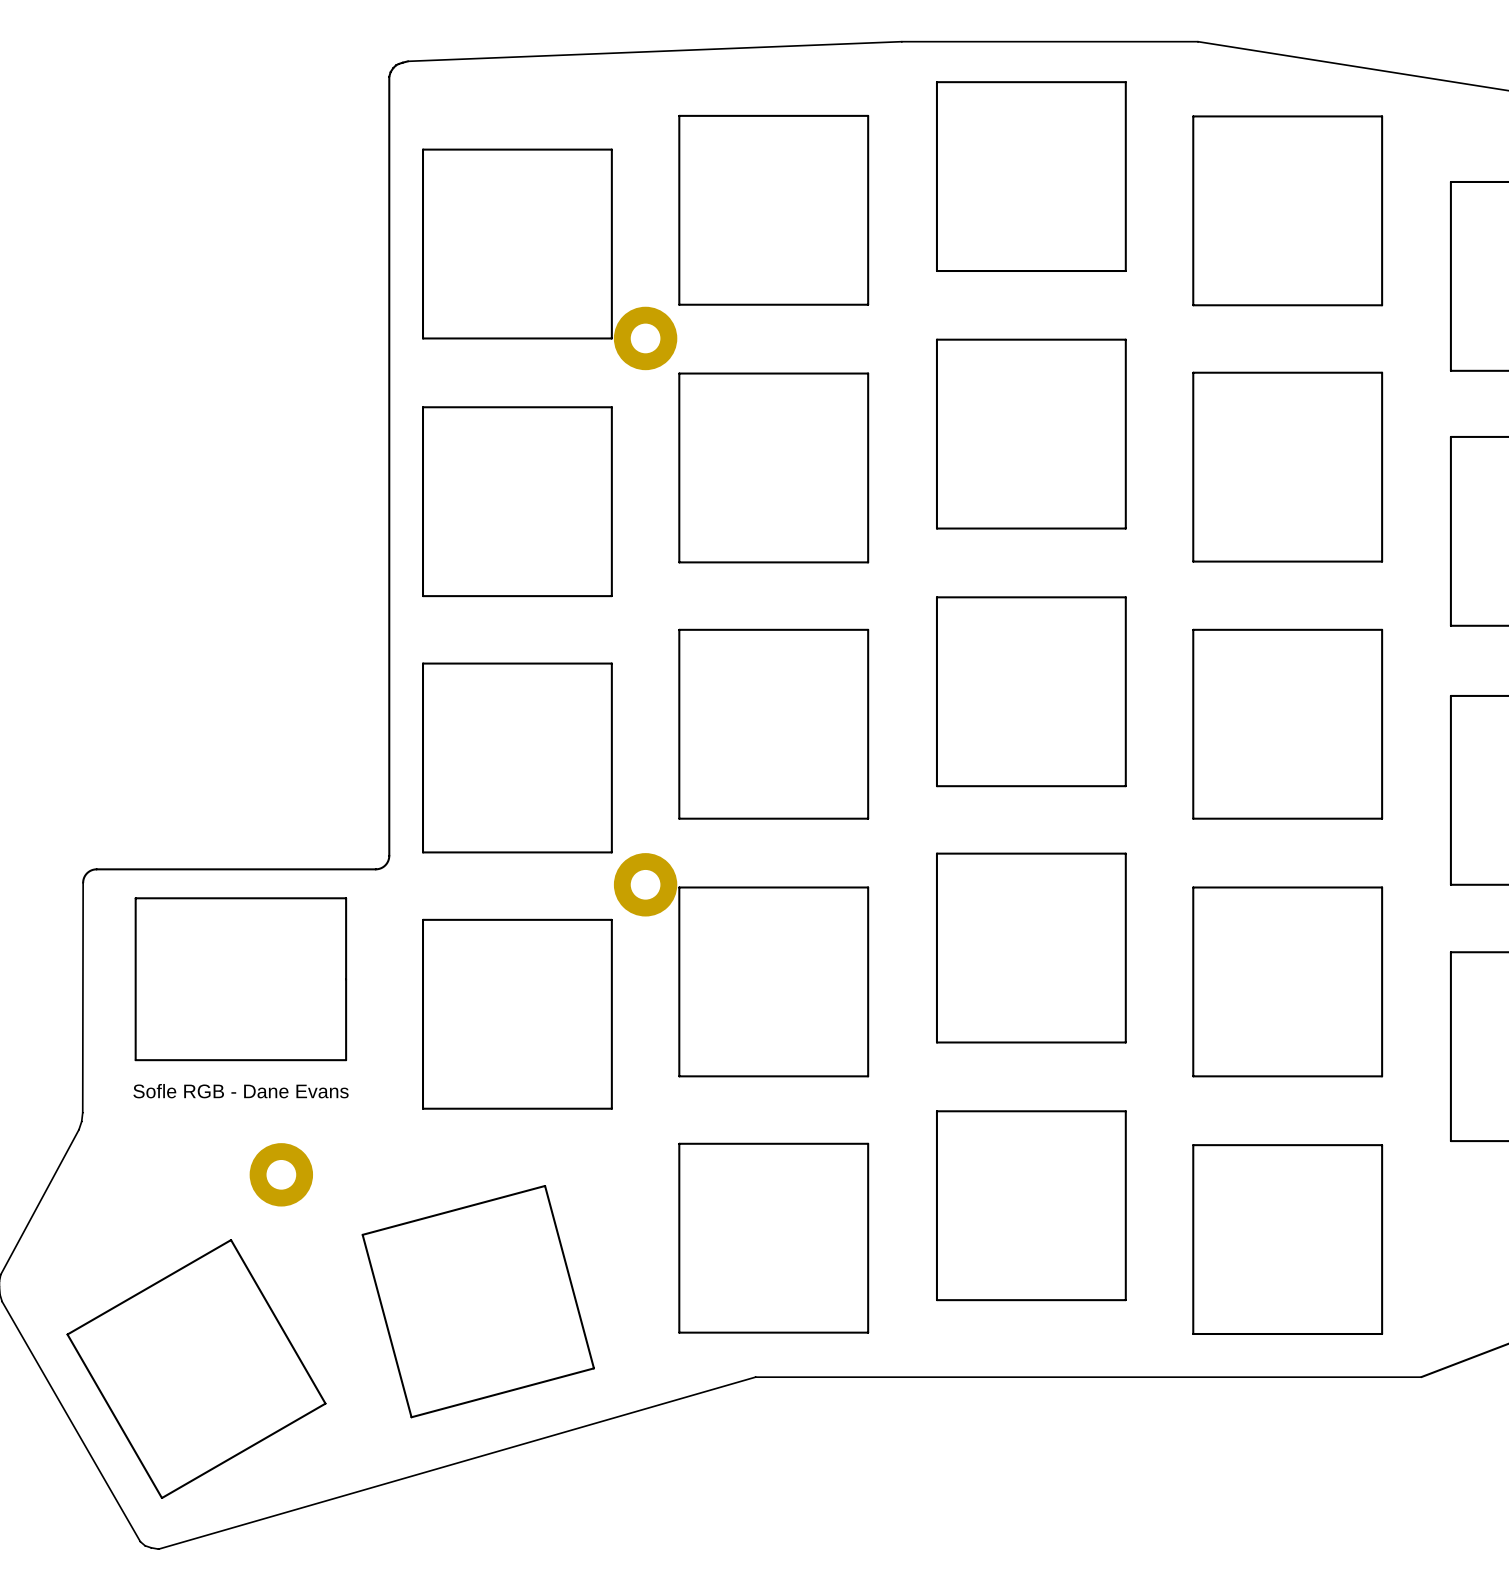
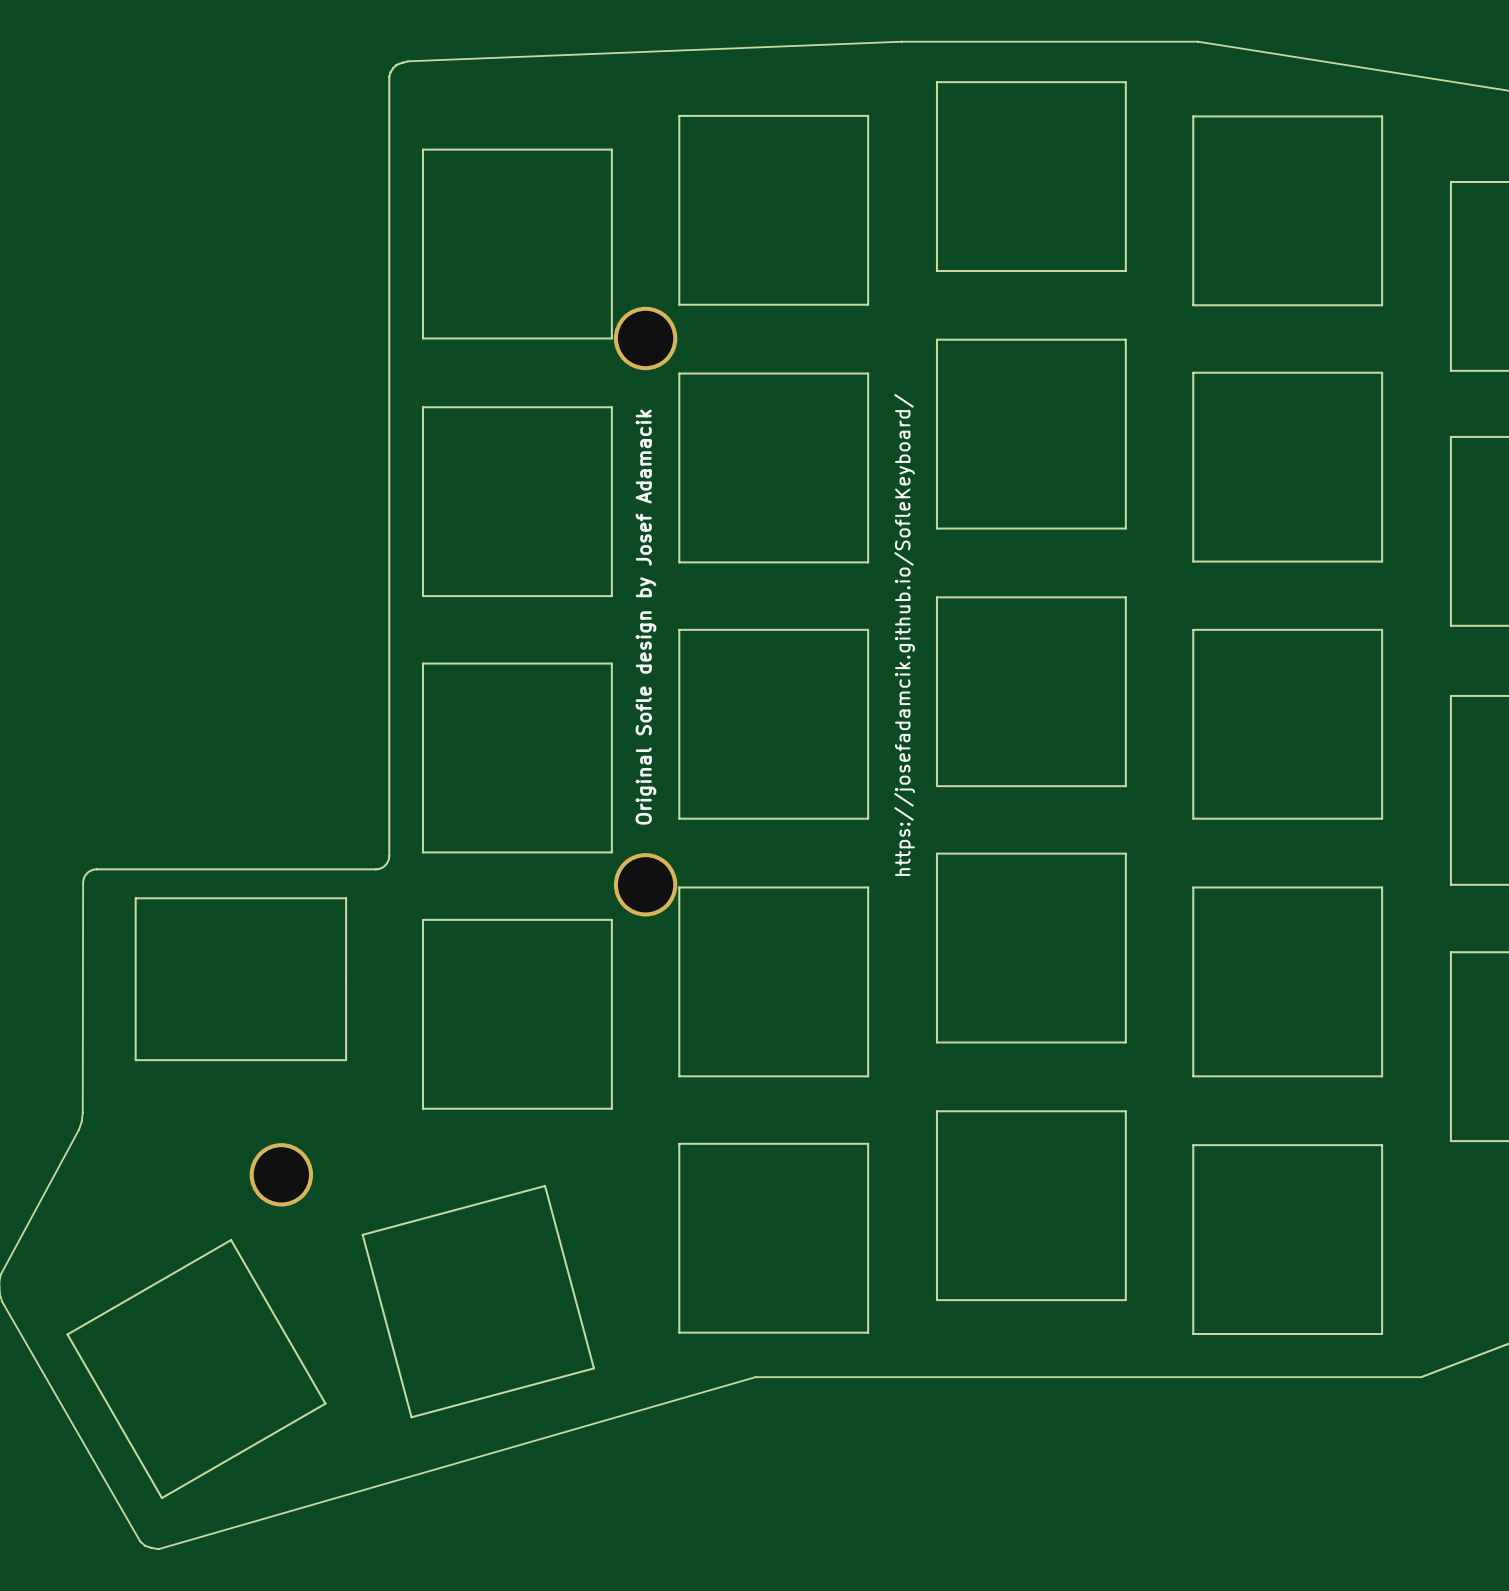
part footprint: [613, 306, 678, 371] -> [613, 306, 678, 371]
text: none -> Original Sofle design by Josef Adamacik (645, 617)
text: none -> https://josefadamcik.github.io/SofleKeyboard/ (904, 635)
part footprint: [613, 853, 678, 917] -> [613, 853, 678, 917]
text: Sofle RGB - Dane Evans (240, 1091) -> none
part footprint: [249, 1143, 314, 1207] -> [249, 1143, 314, 1207]

